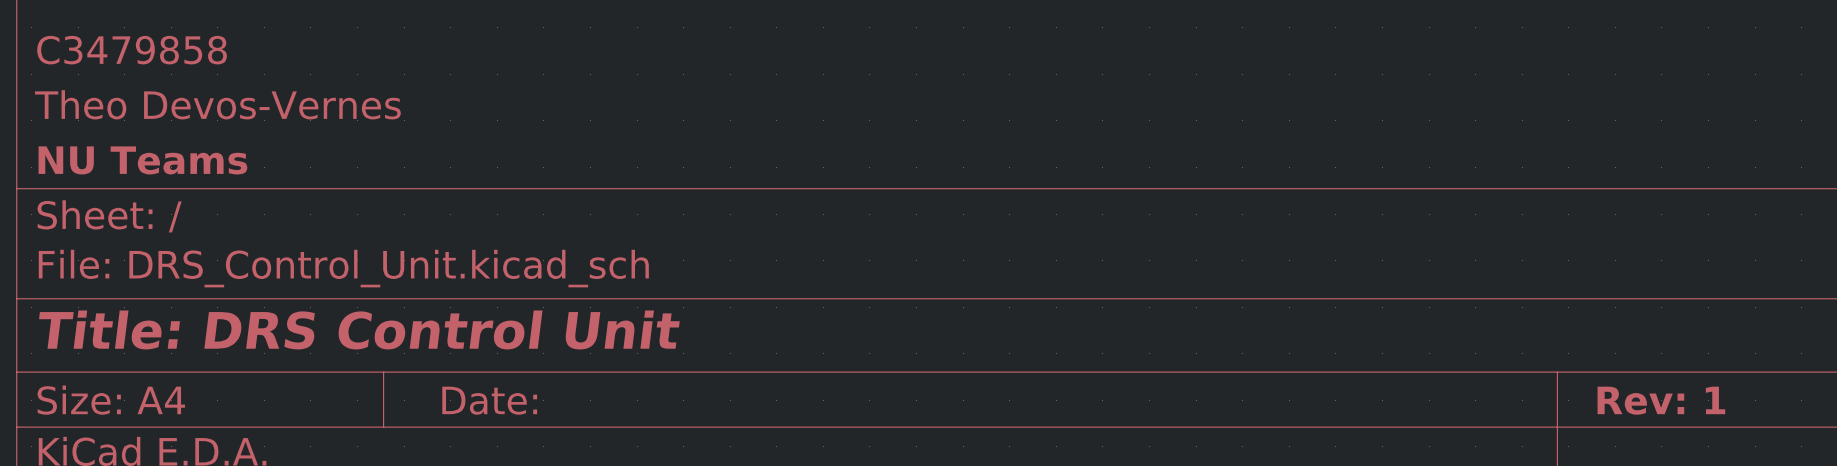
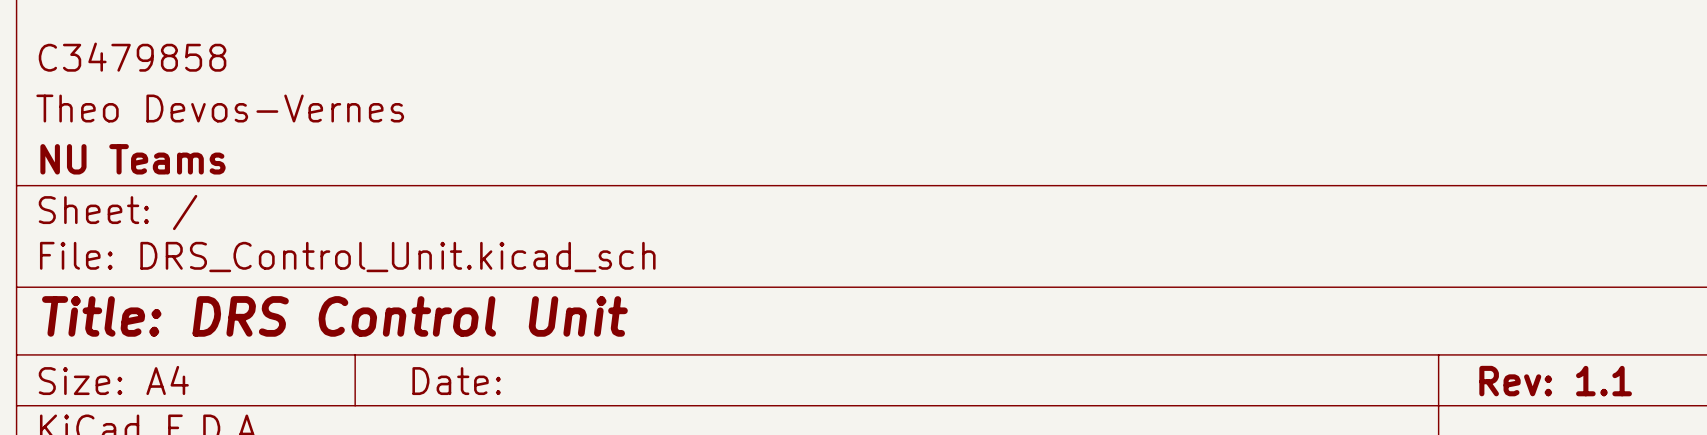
title block: Rev: 1 (1661, 400) -> Rev: 1.1 (1555, 381)

